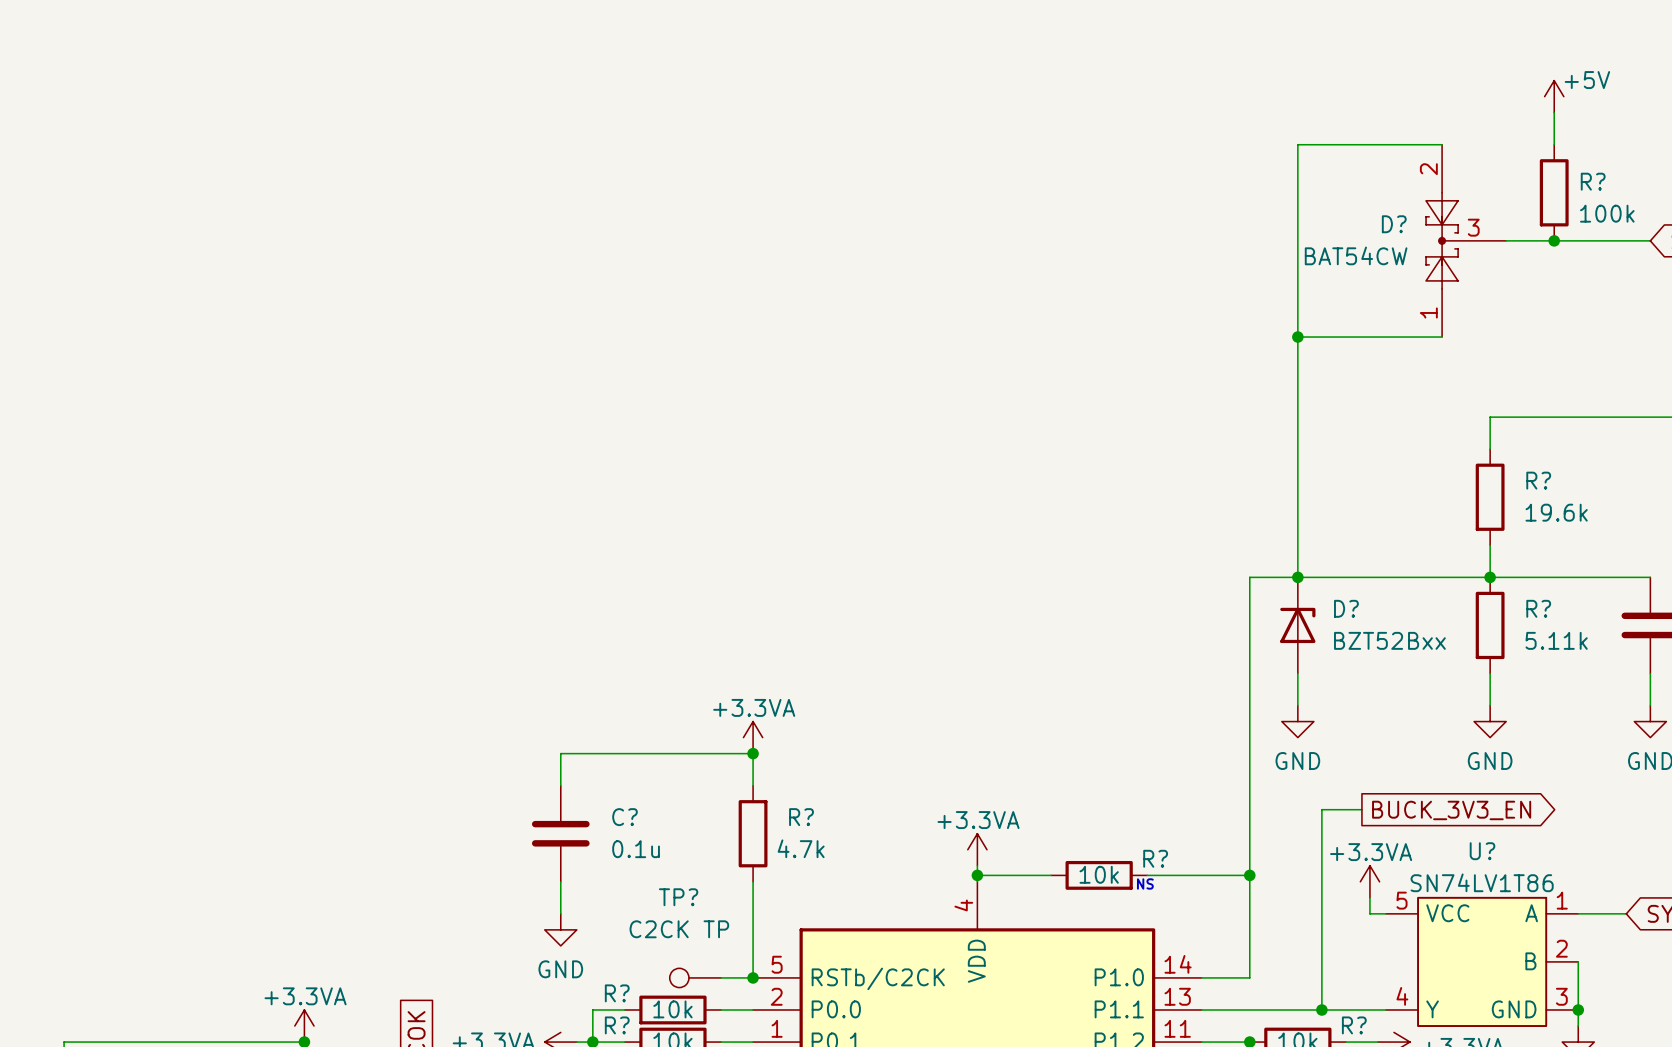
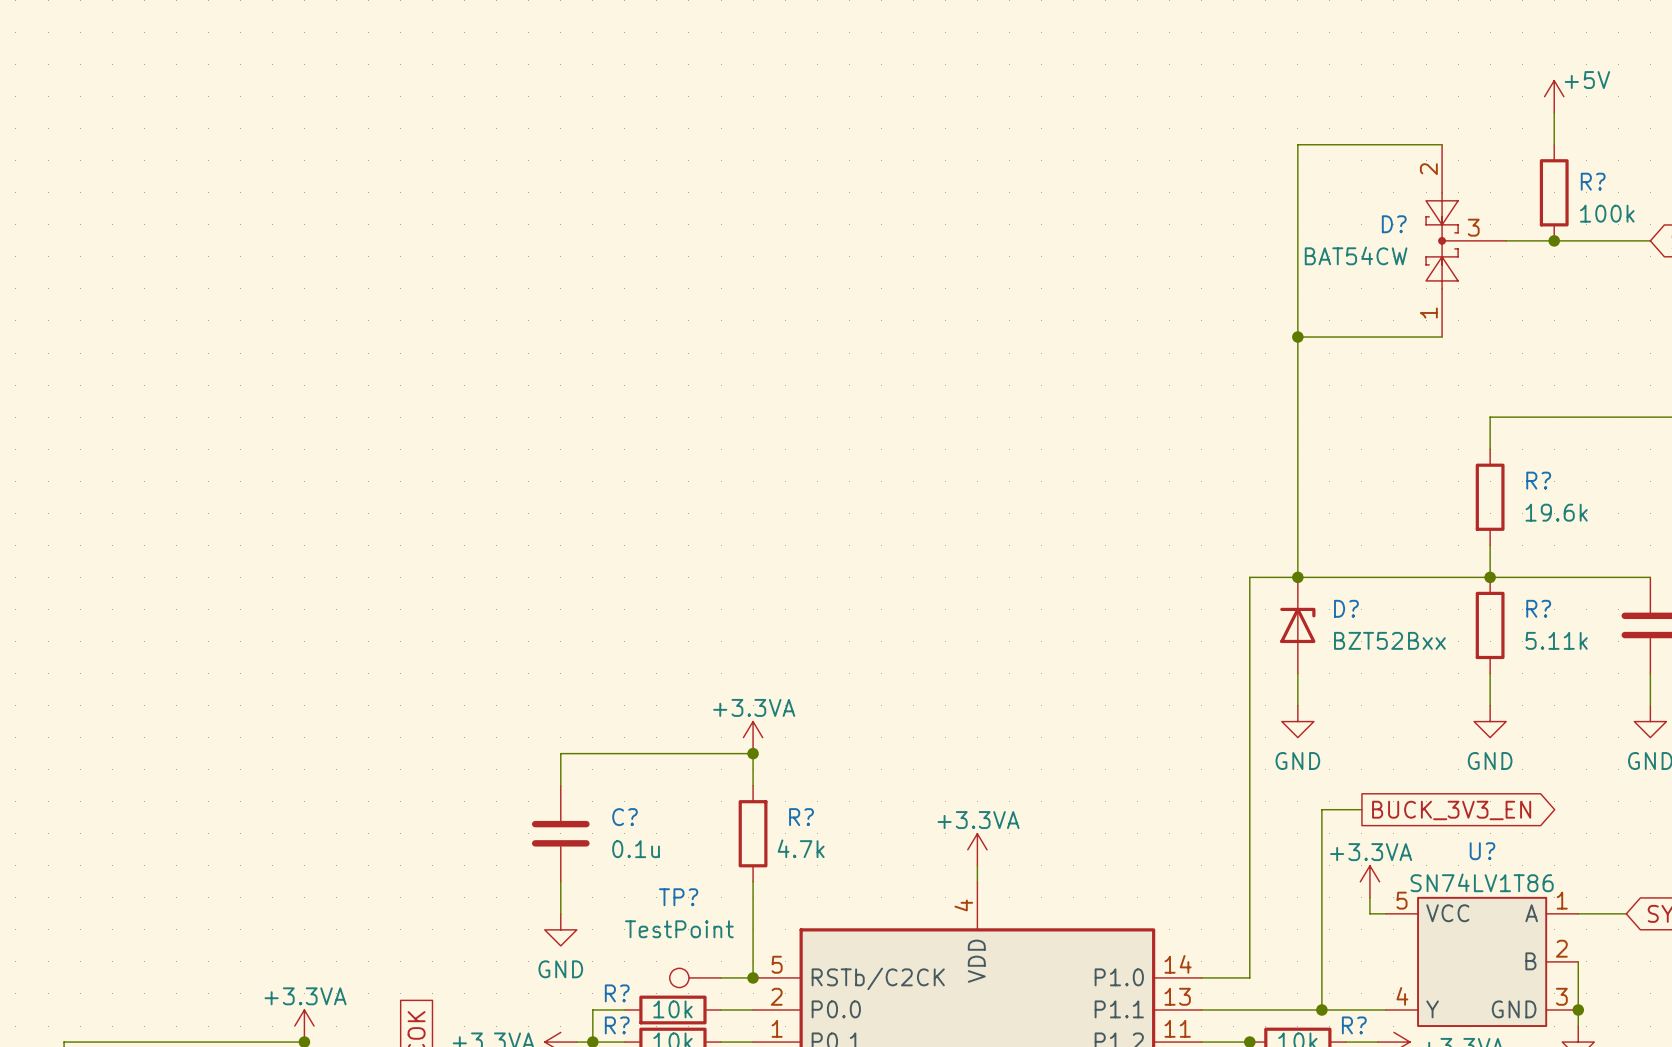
wire: (977, 875) (1051, 875) -> none
junction: (977, 875) -> none
R?: 10k (1099, 875) -> none
wire: (1147, 875) (1249, 875) -> none
junction: (1249, 875) -> none
text: NS (1145, 883) -> none
TP? value: C2CK TP (679, 929) -> TestPoint (679, 929)

